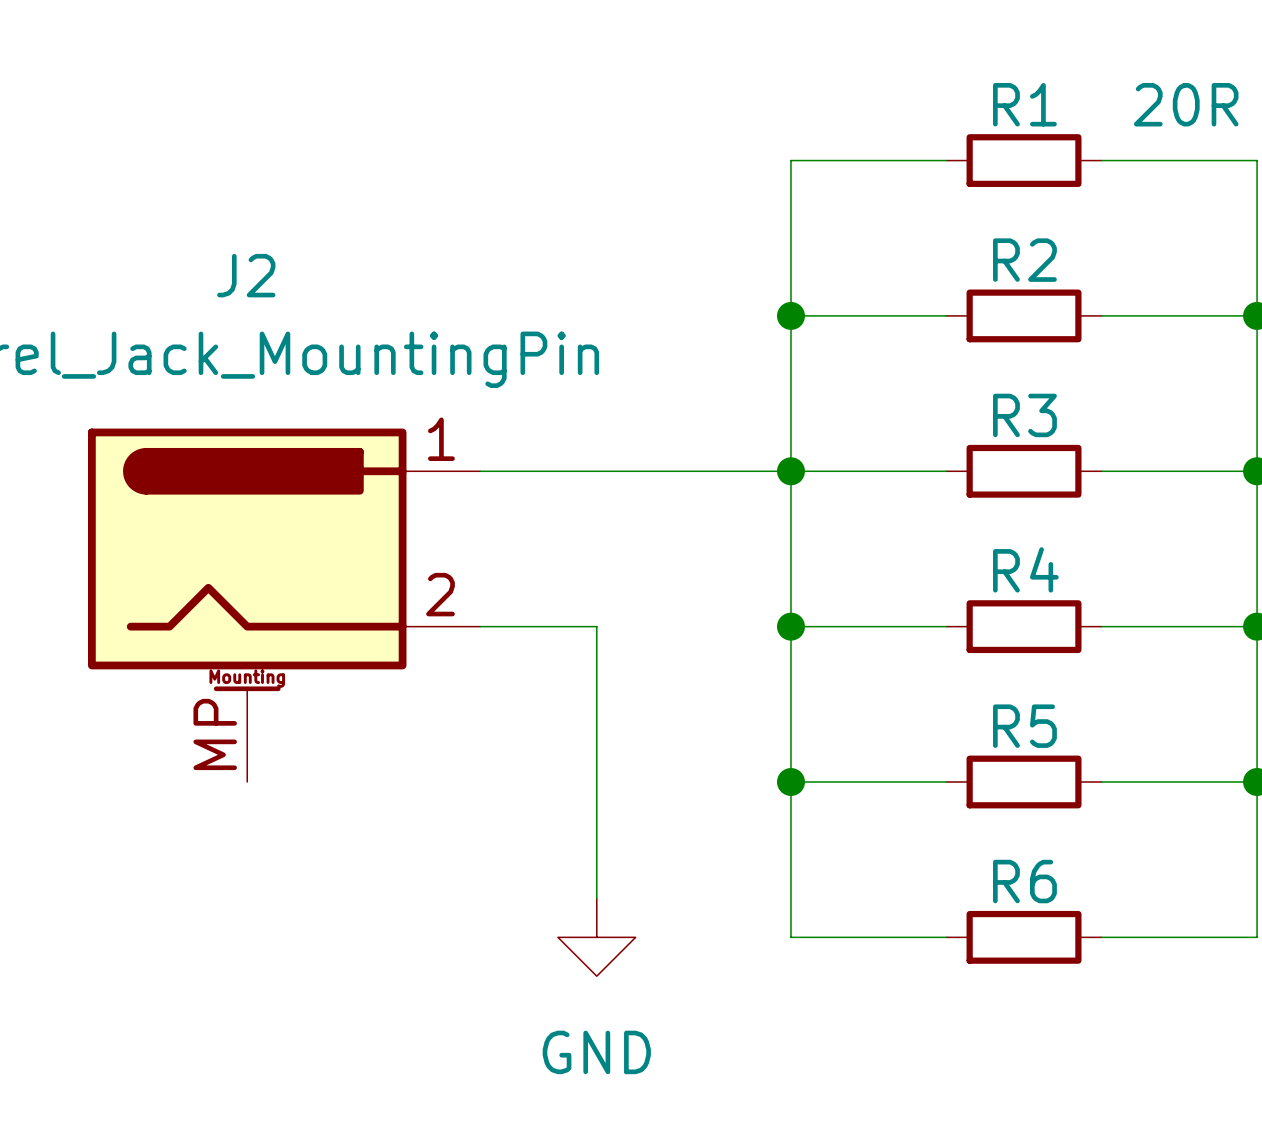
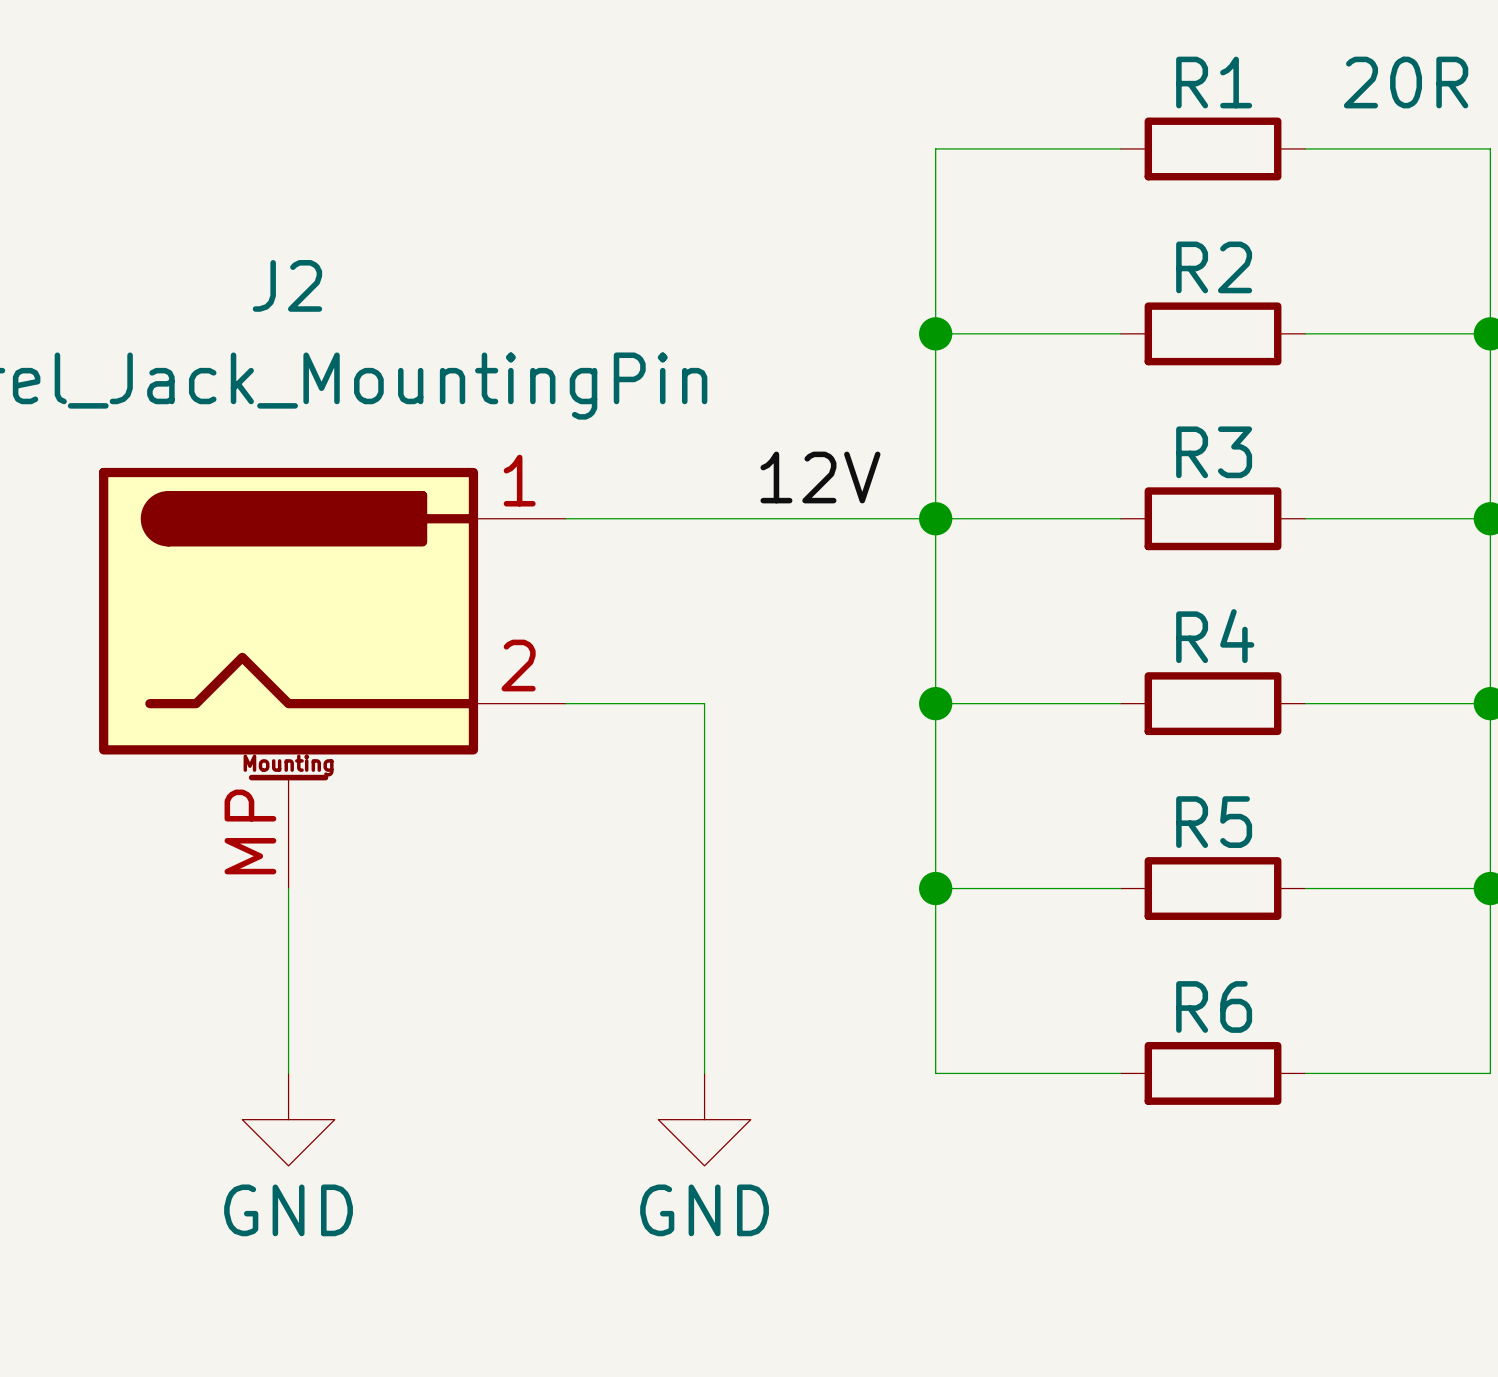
label: none -> 12V (820, 477)
wire: none -> (288, 888) (288, 1073)
power symbol position: GND (596, 937) -> GND (704, 1119)
power symbol: none -> GND (288, 1119)

